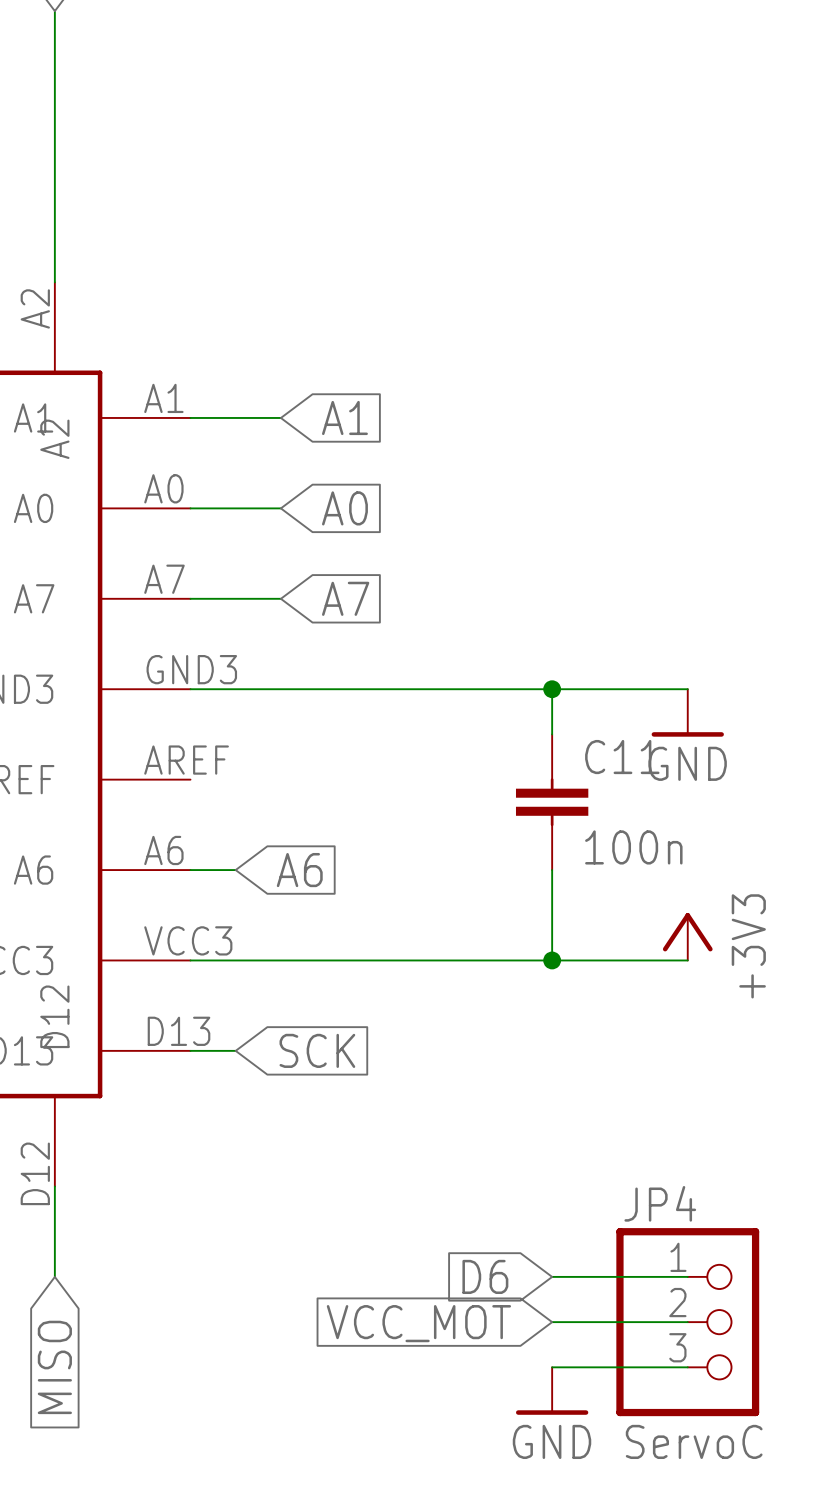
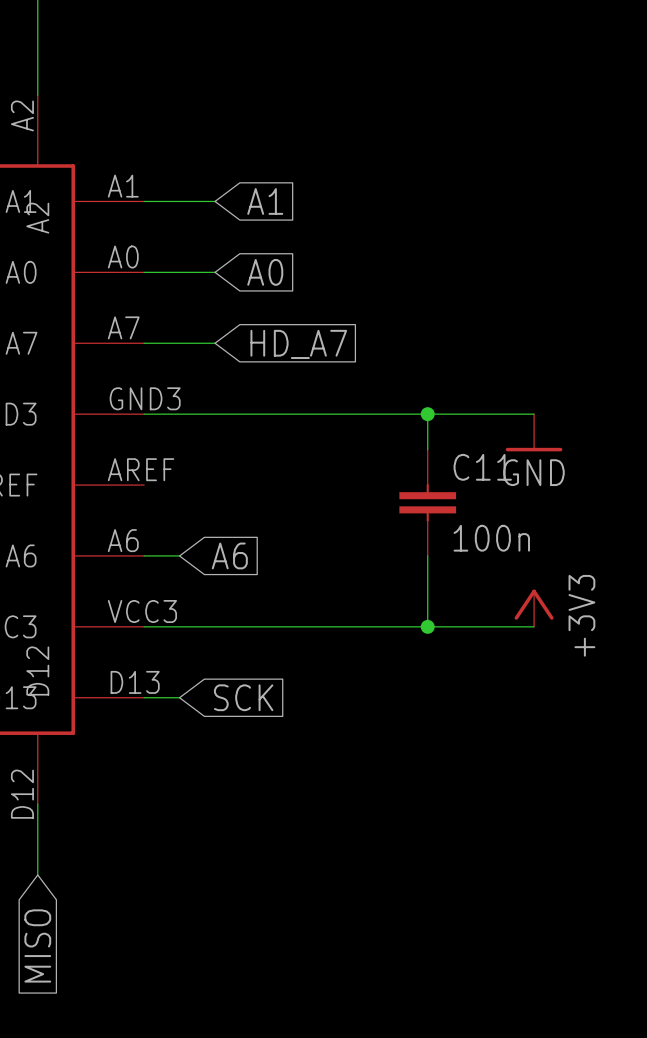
global label: A7 (345, 598) -> HD_A7 (298, 344)
global label: D6 (485, 1276) -> none
wire: (552, 1276) (687, 1276) -> none
wire: (552, 1322) (687, 1322) -> none
JP4: ServoC (687, 1322) -> none
global label: VCC_MOT (418, 1323) -> none
wire: (552, 1367) (687, 1367) -> none
power symbol: GND (552, 1391) -> none

